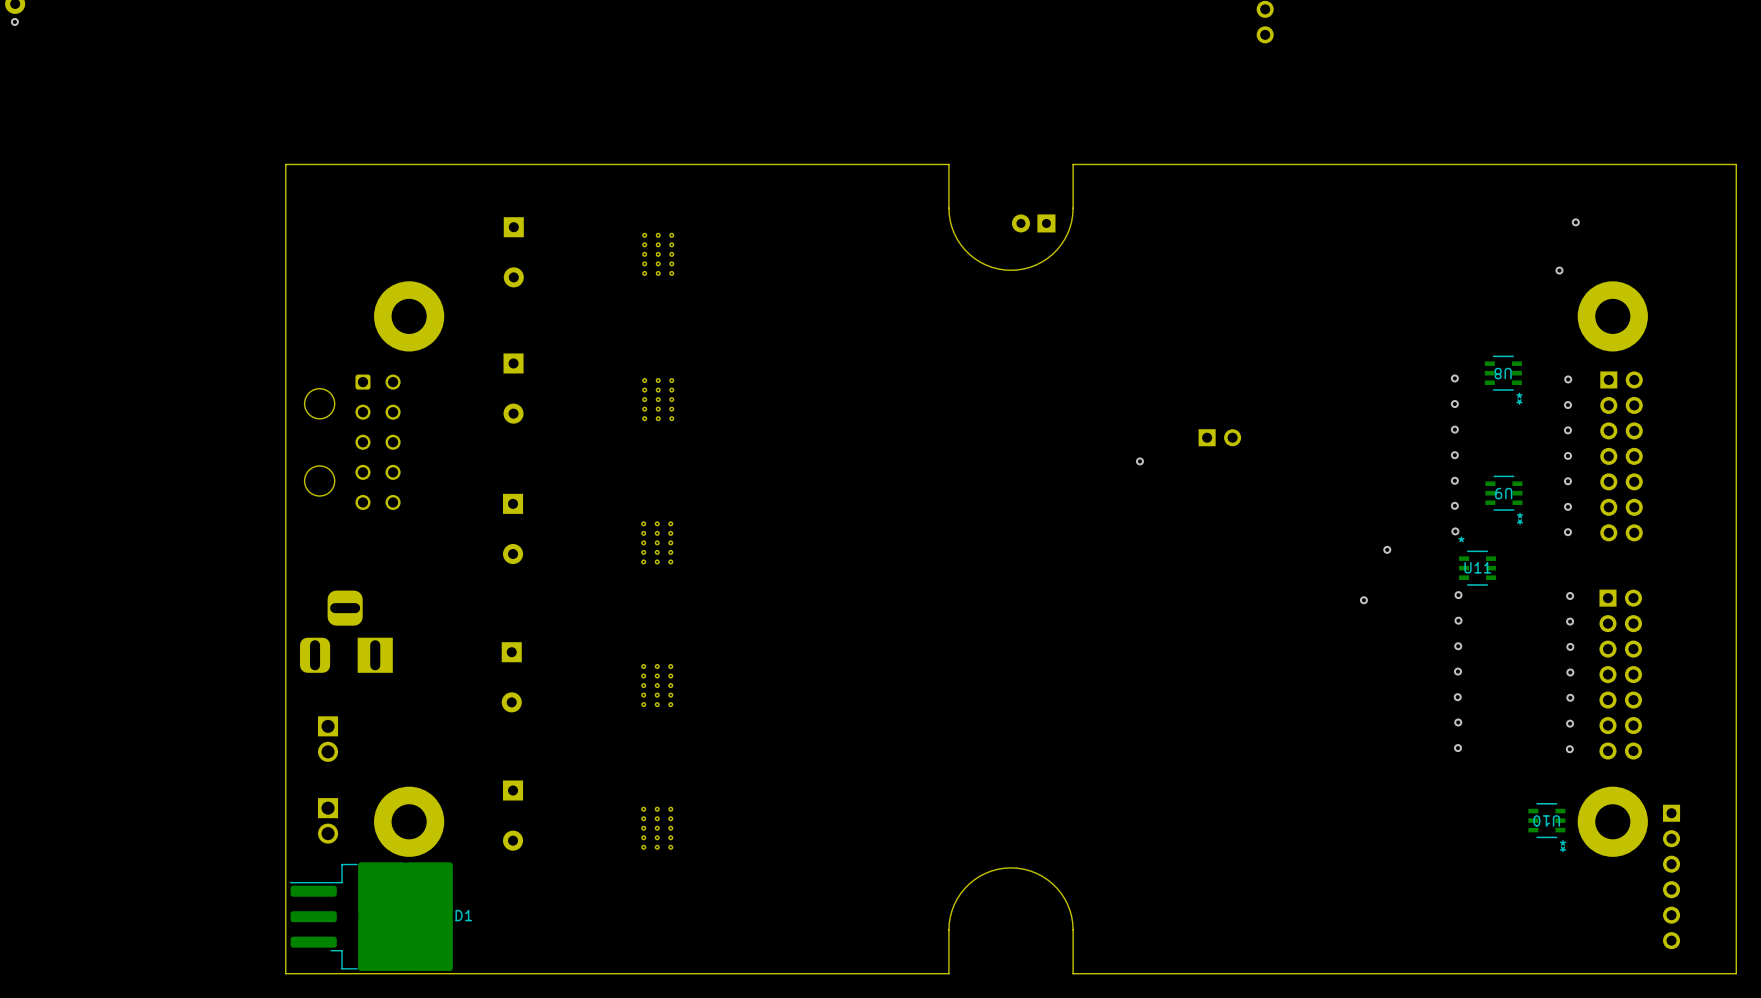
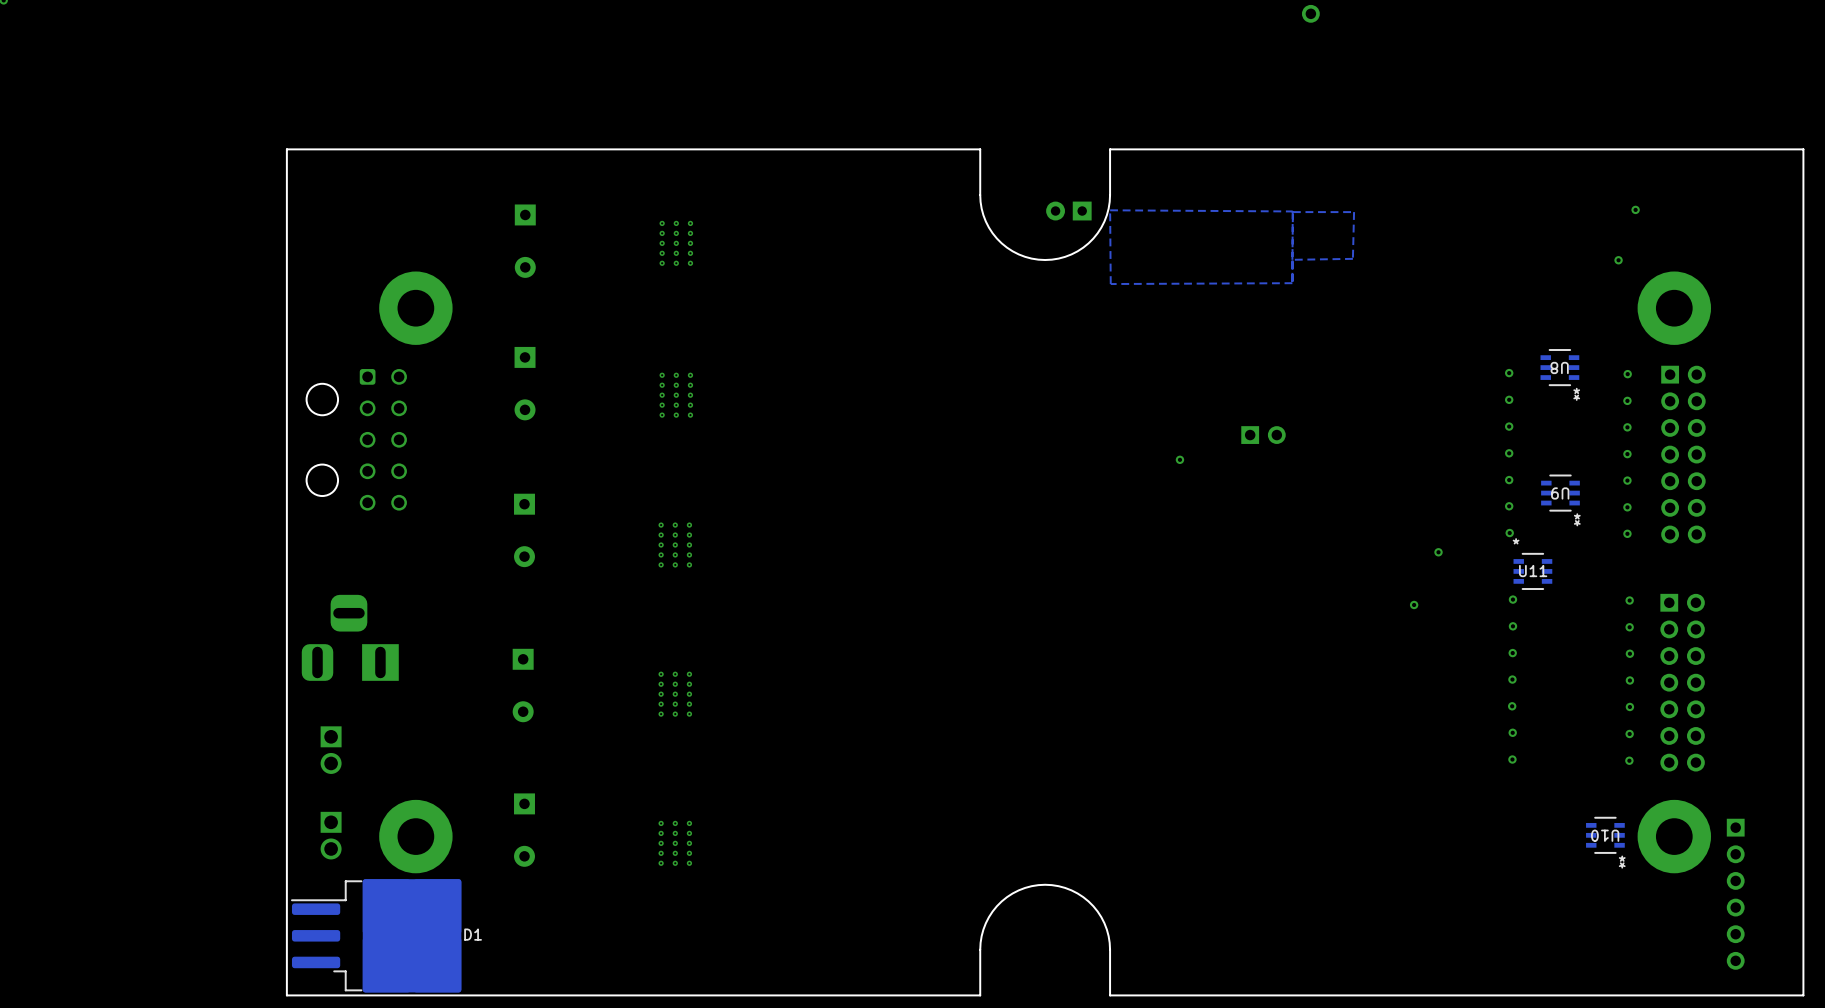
zone outline: none -> (1110, 210) (1110, 284) (1292, 283) (1292, 211) (1110, 210)
zone outline: none -> (1354, 212) (1352, 258) (1292, 259) (1292, 212) (1354, 212)

